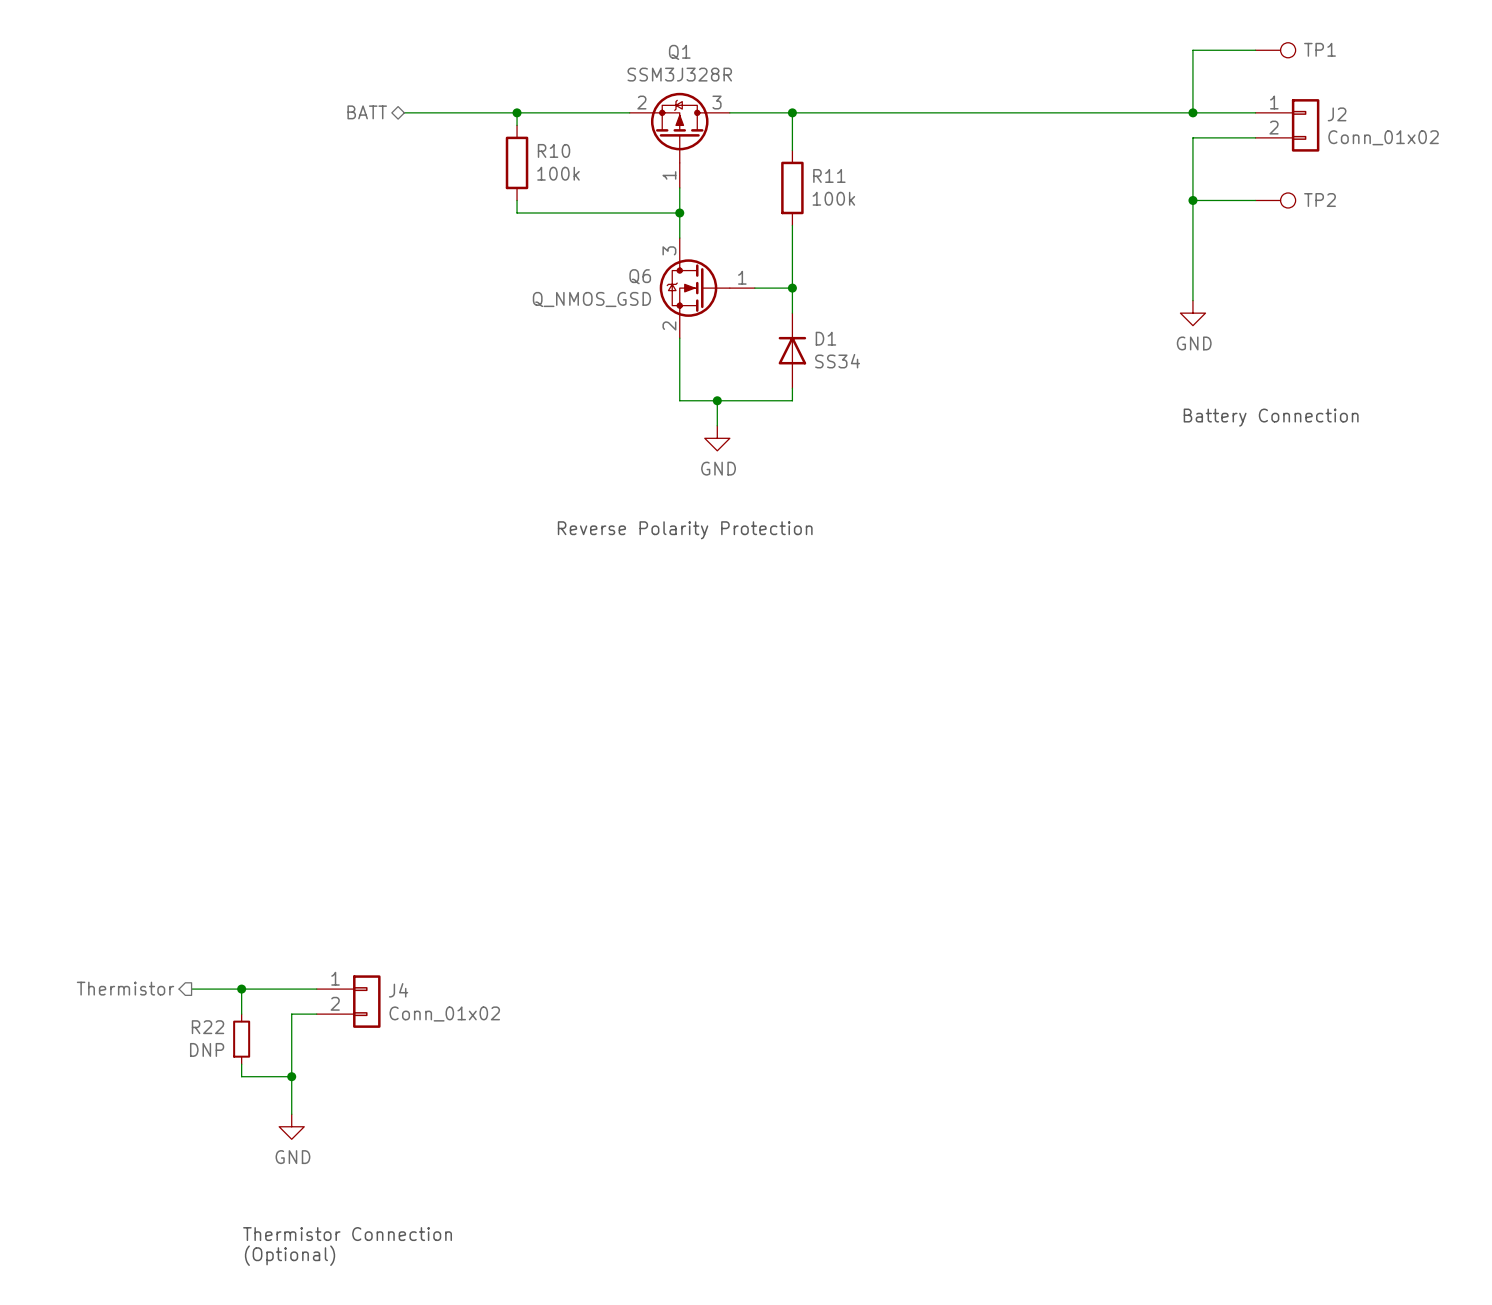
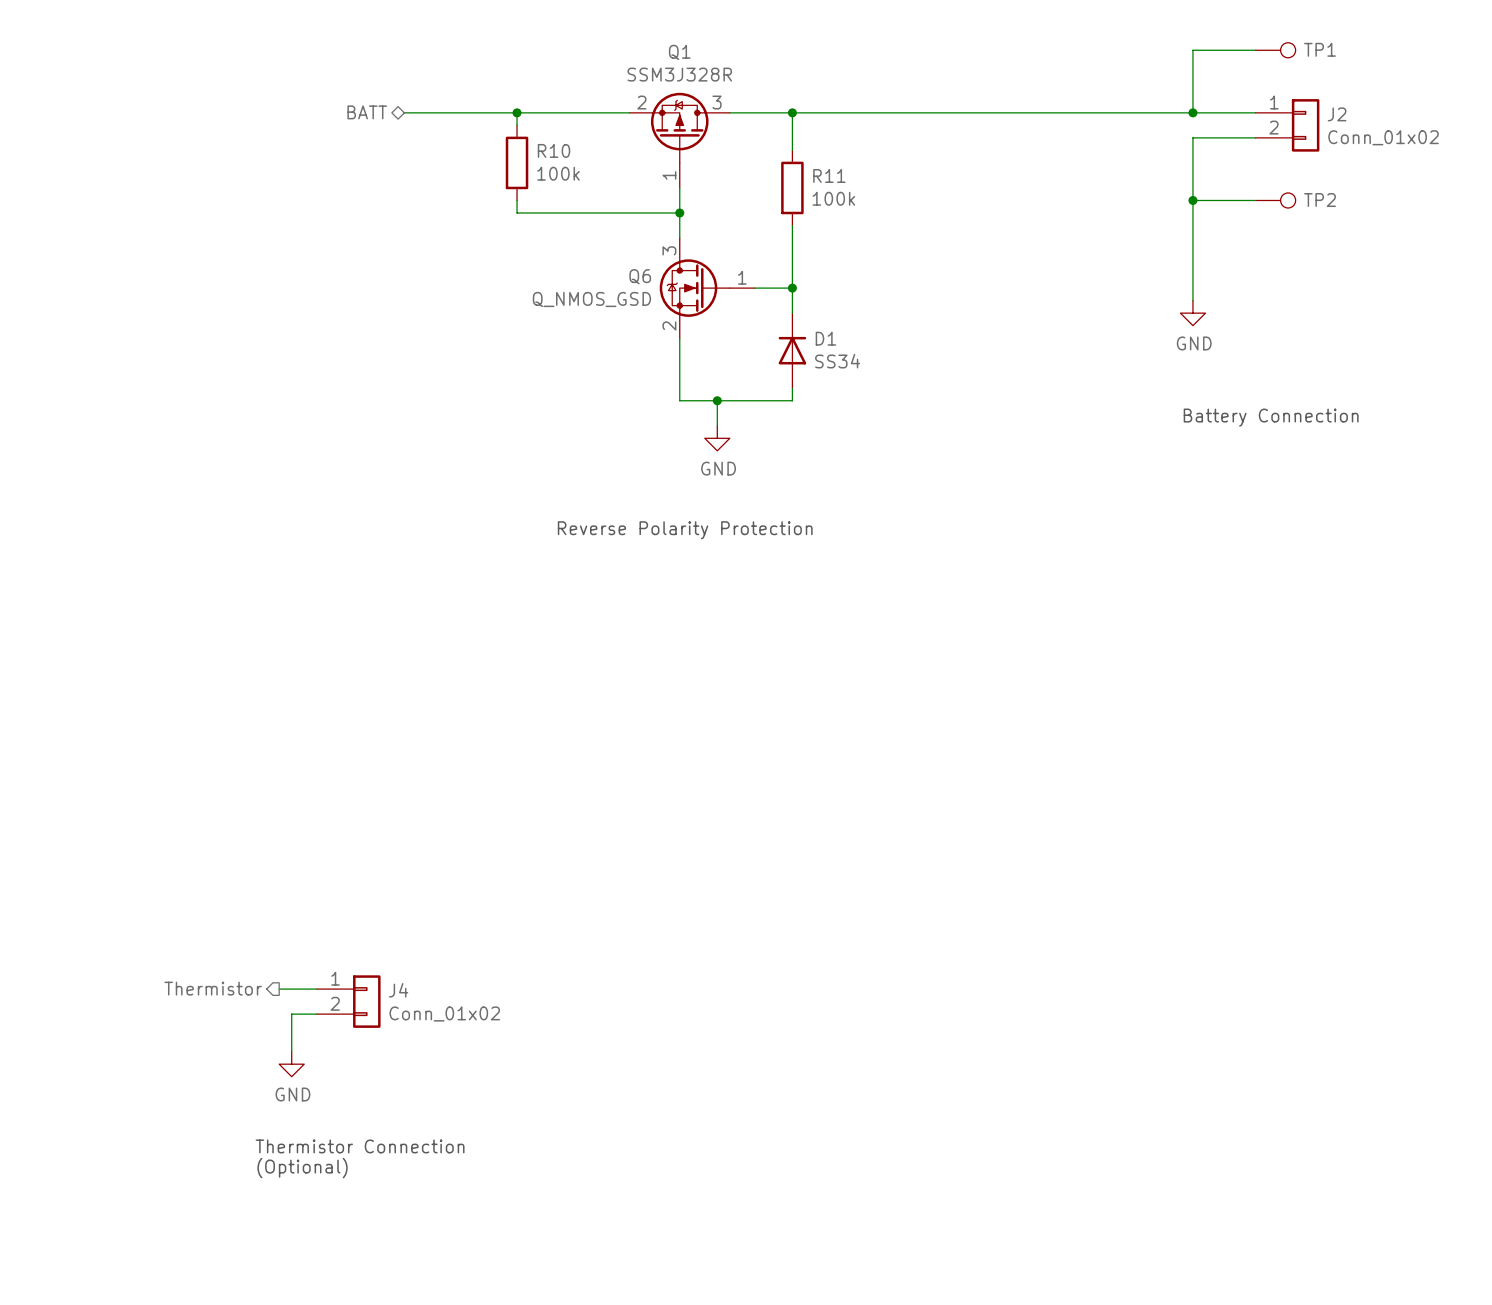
hierarchical label position: Thermistor (125, 988) -> Thermistor (213, 988)
wire: (191, 989) (279, 989) -> none
wire: (241, 989) (241, 1014) -> none
junction: (241, 989) -> none
R22: DNP (241, 1039) -> none
wire: (291, 1051) (291, 1114) -> none
wire: (241, 1064) (241, 1076) (291, 1076) -> none
junction: (291, 1076) -> none
power symbol position: GND (291, 1126) -> GND (291, 1064)
text position: Thermistor Connection (347, 1234) -> Thermistor Connection (360, 1146)
text position: (Optional) (290, 1255) -> (Optional) (302, 1168)

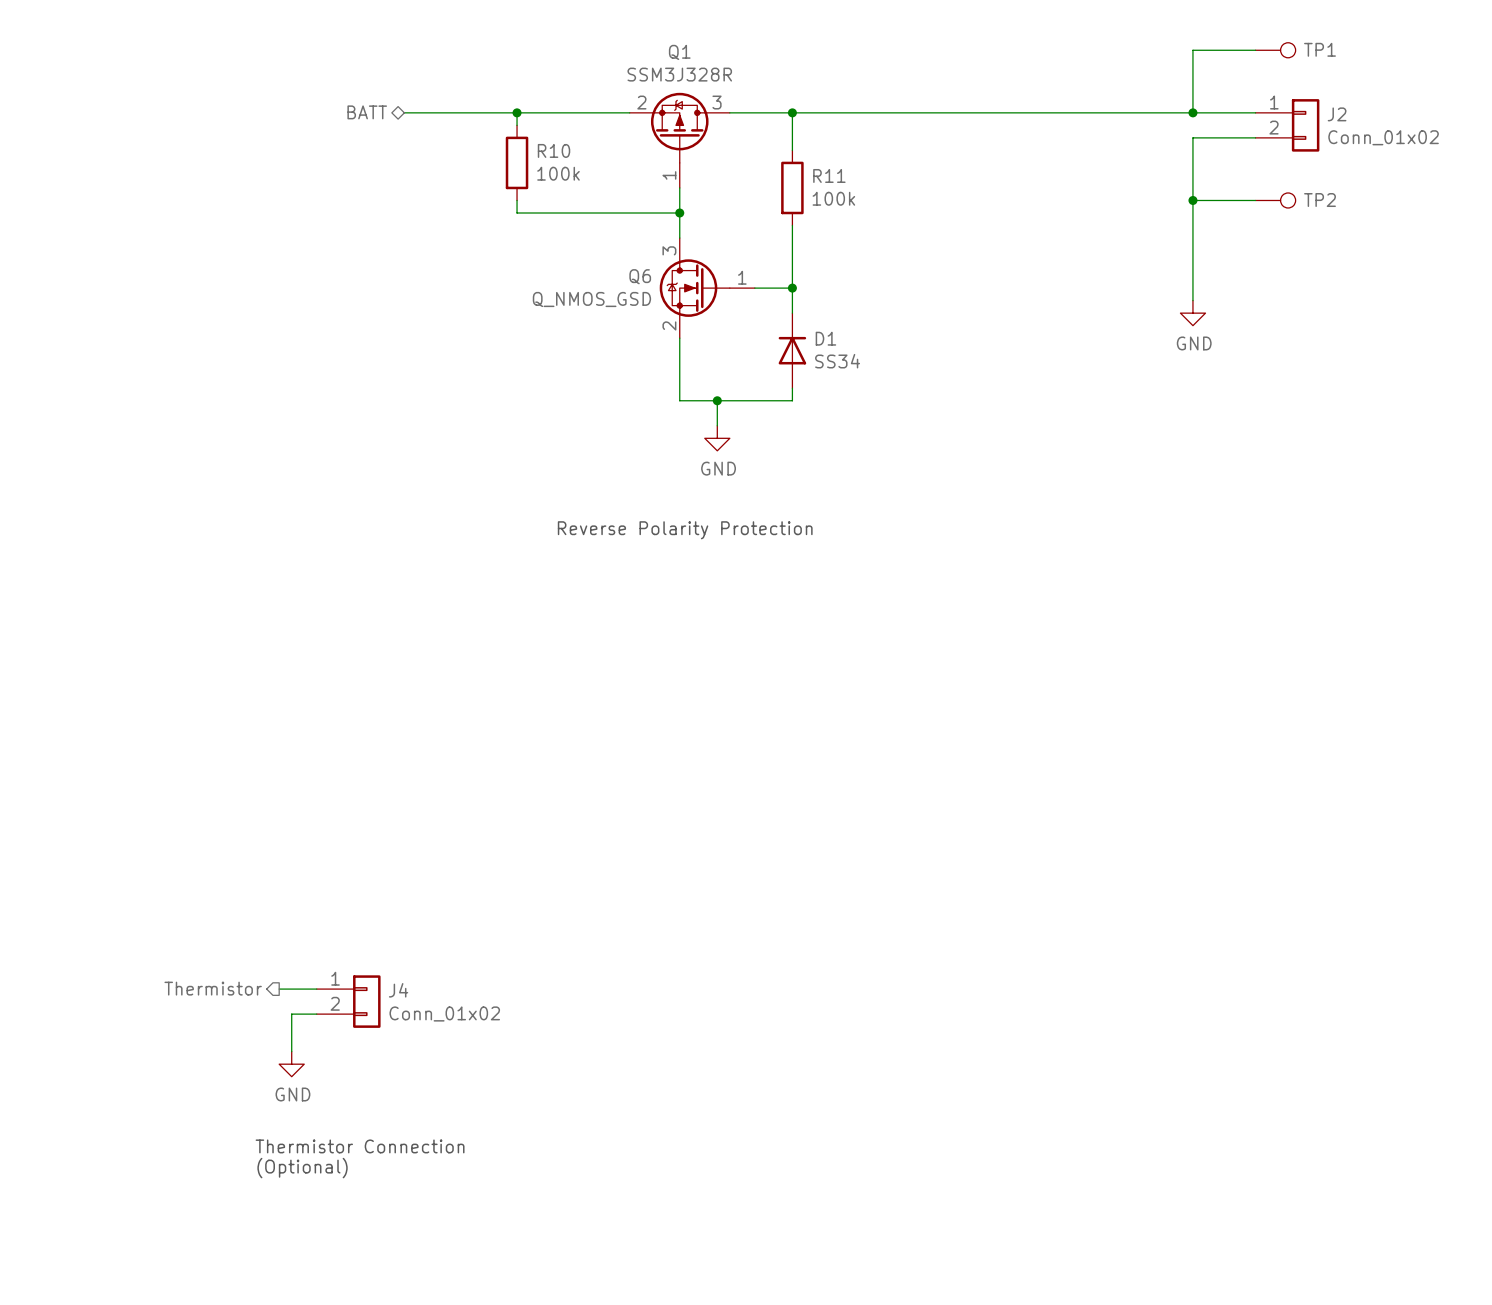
text: Battery Connection (1271, 417) -> none

